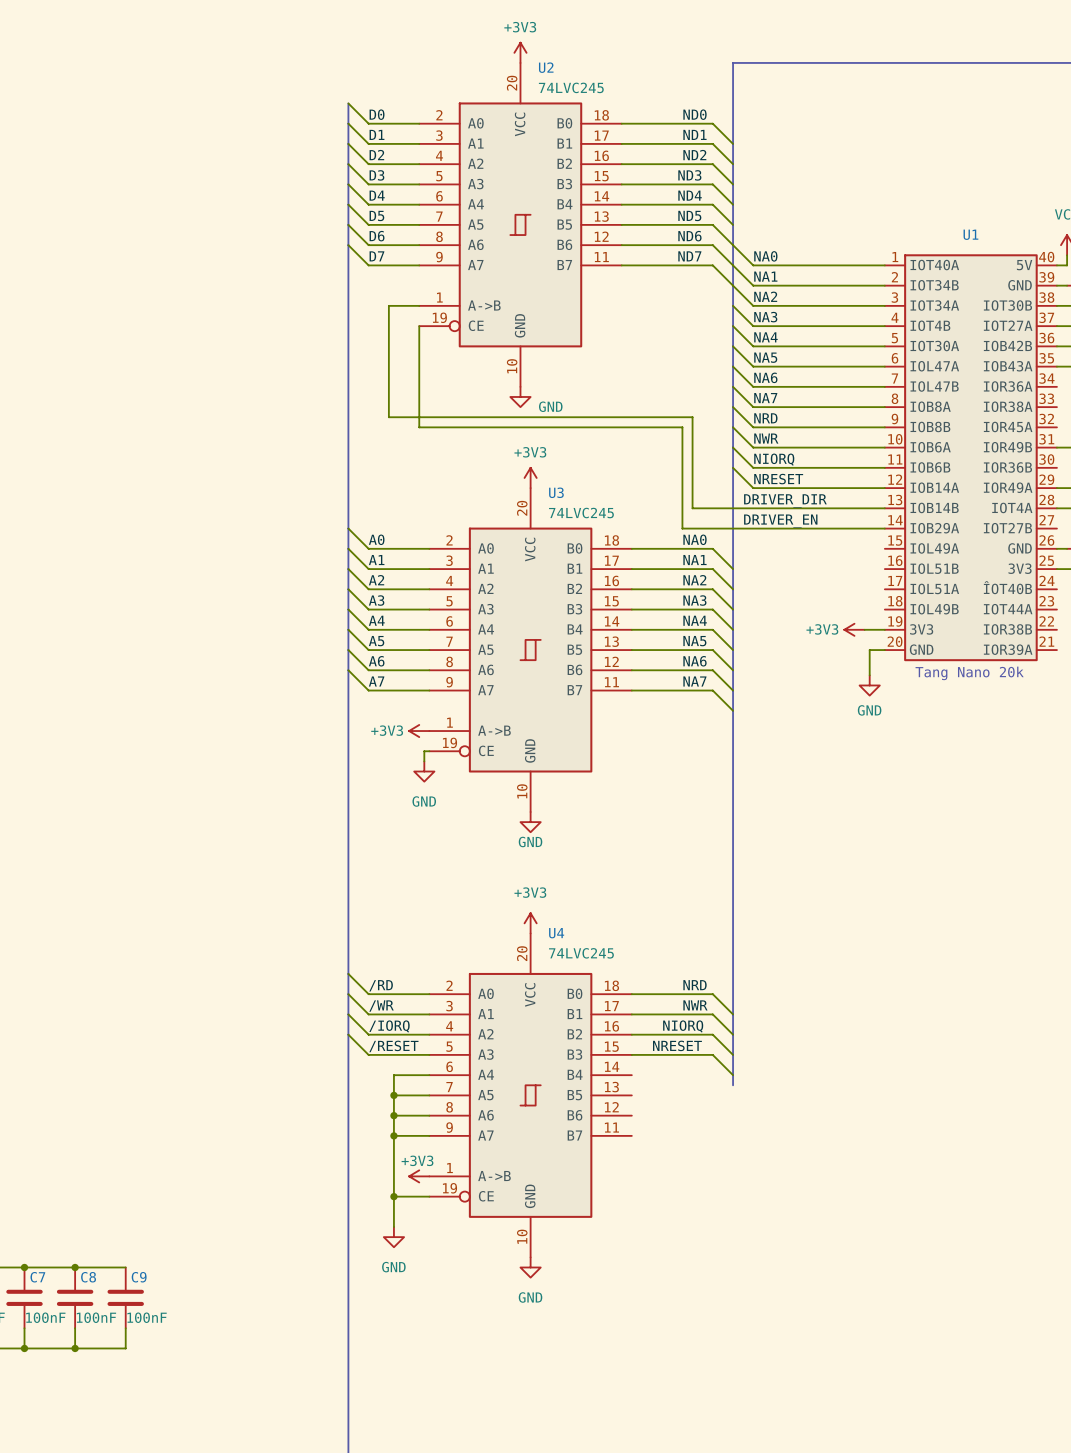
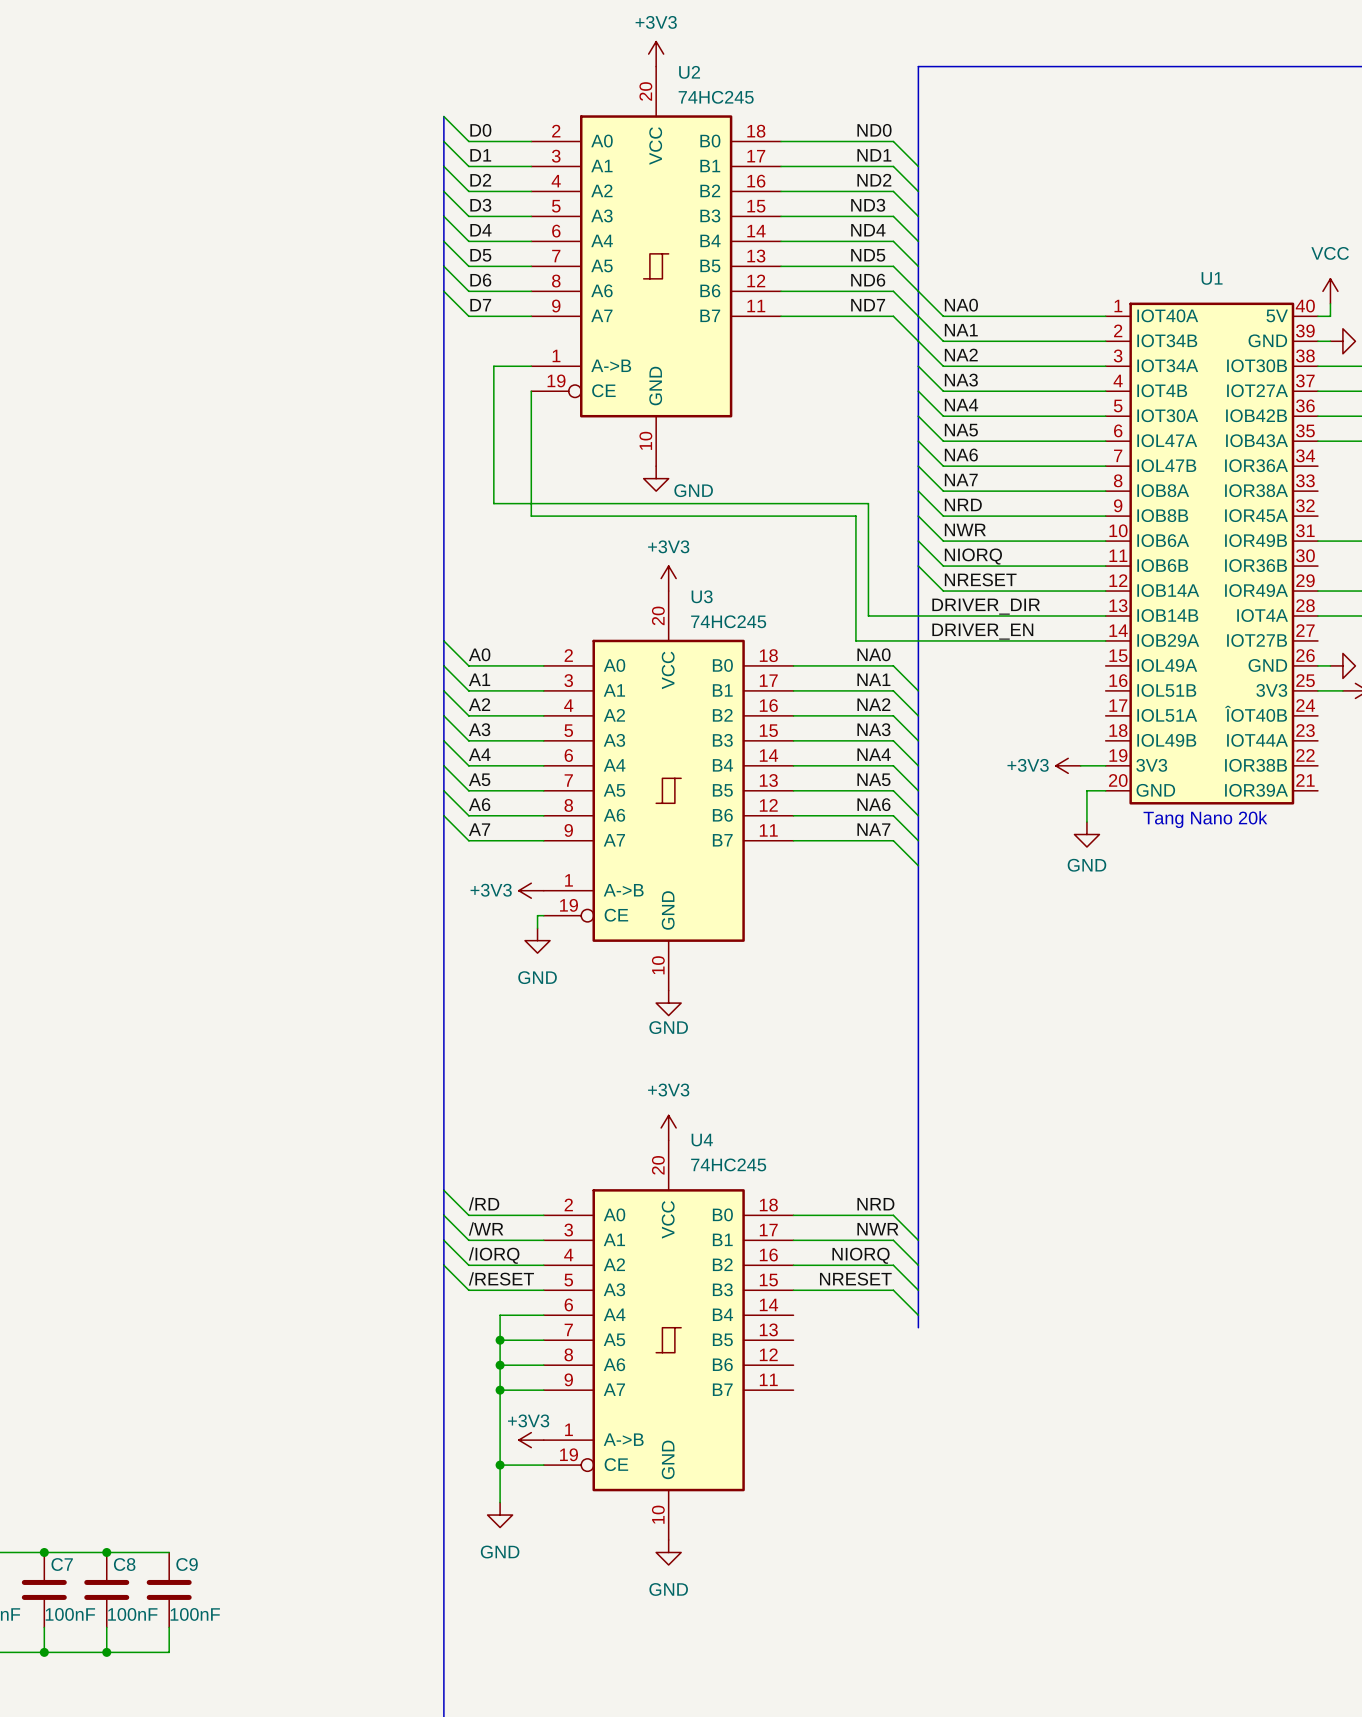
U2 value: 74LVC245 (571, 87) -> 74HC245 (716, 97)
U3 value: 74LVC245 (581, 513) -> 74HC245 (728, 621)
U4 value: 74LVC245 (581, 953) -> 74HC245 (728, 1164)

